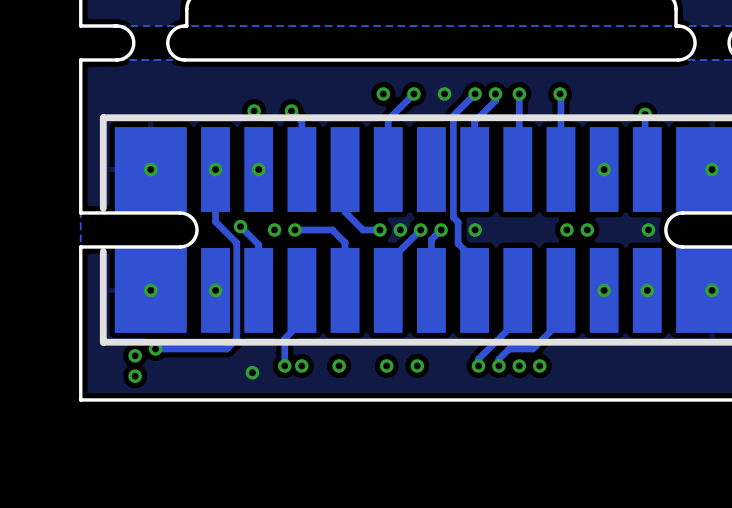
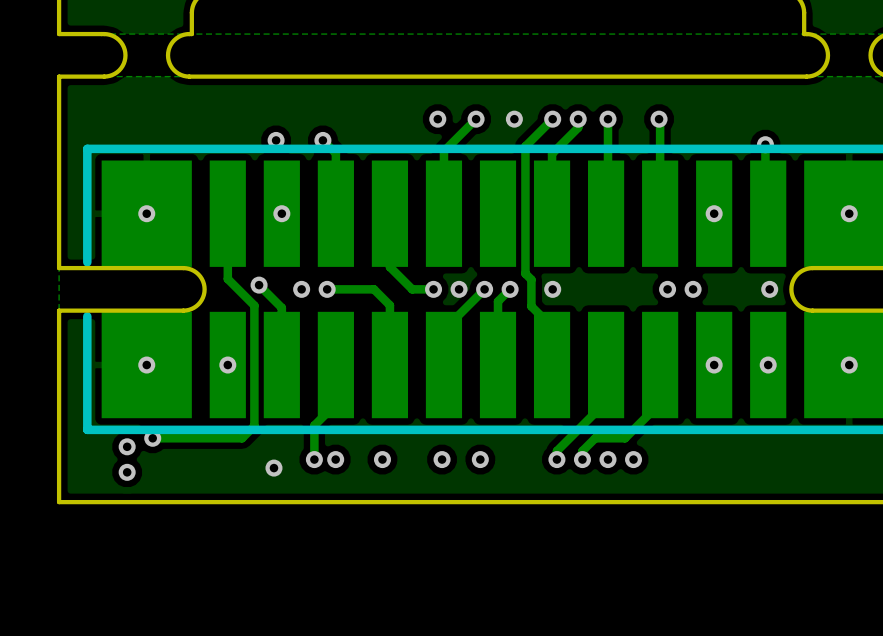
via: (215, 169) -> none

